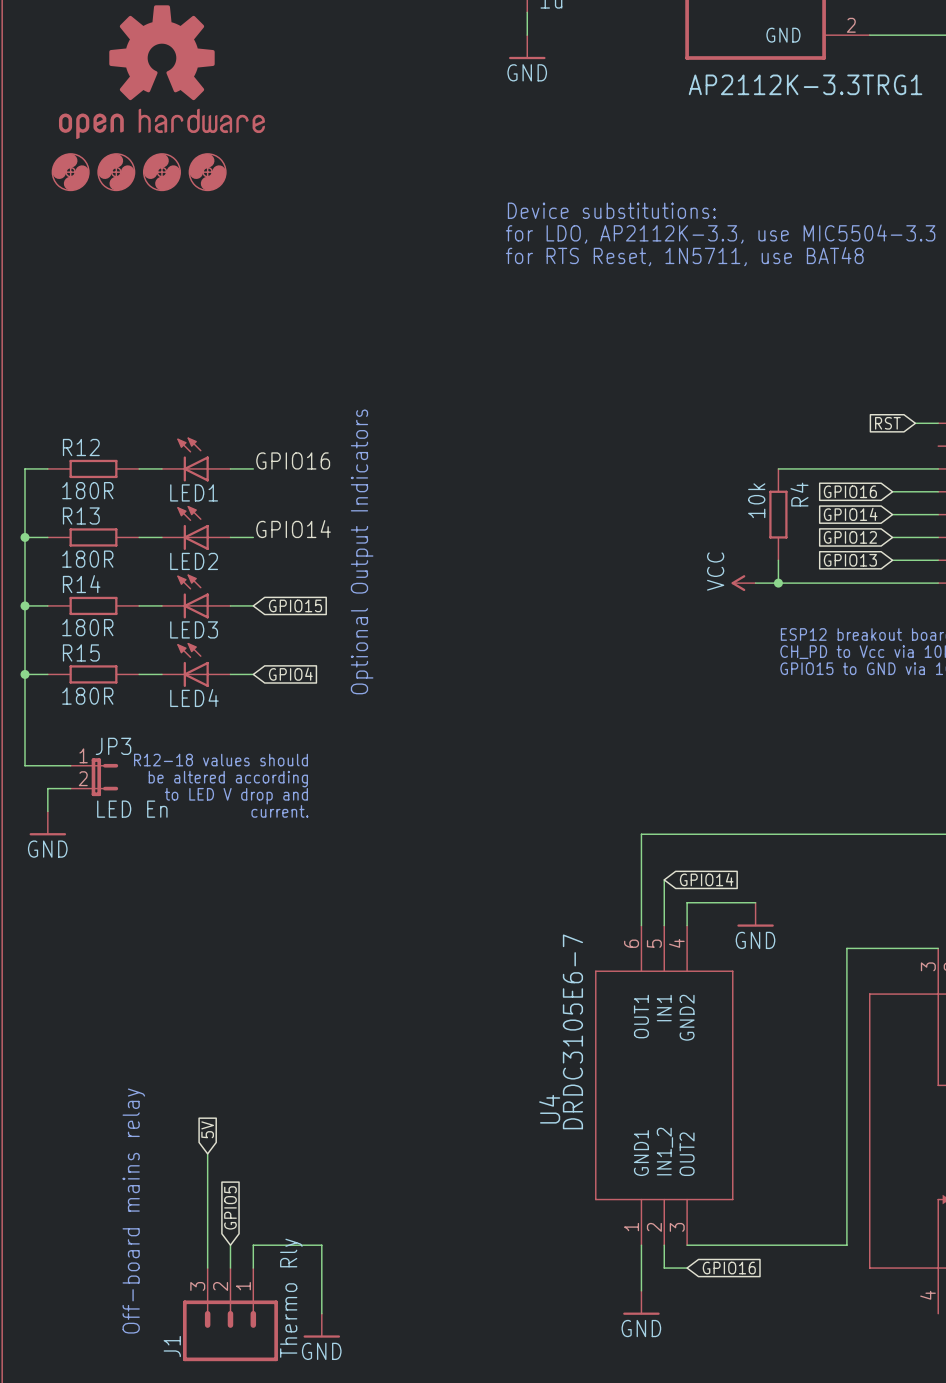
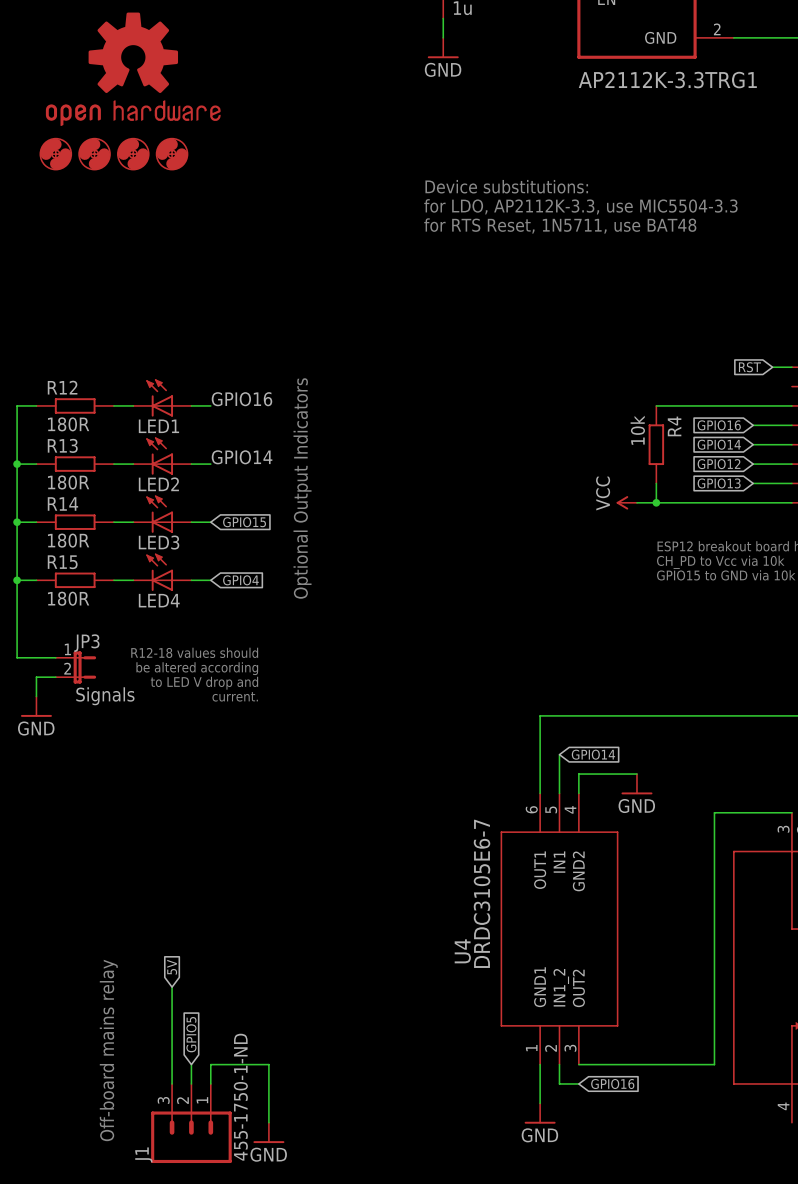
JP3 value: LED En (132, 809) -> Signals (105, 696)
J1 value: Thermo Rly (291, 1298) -> 455-1750-1-ND (240, 1097)

